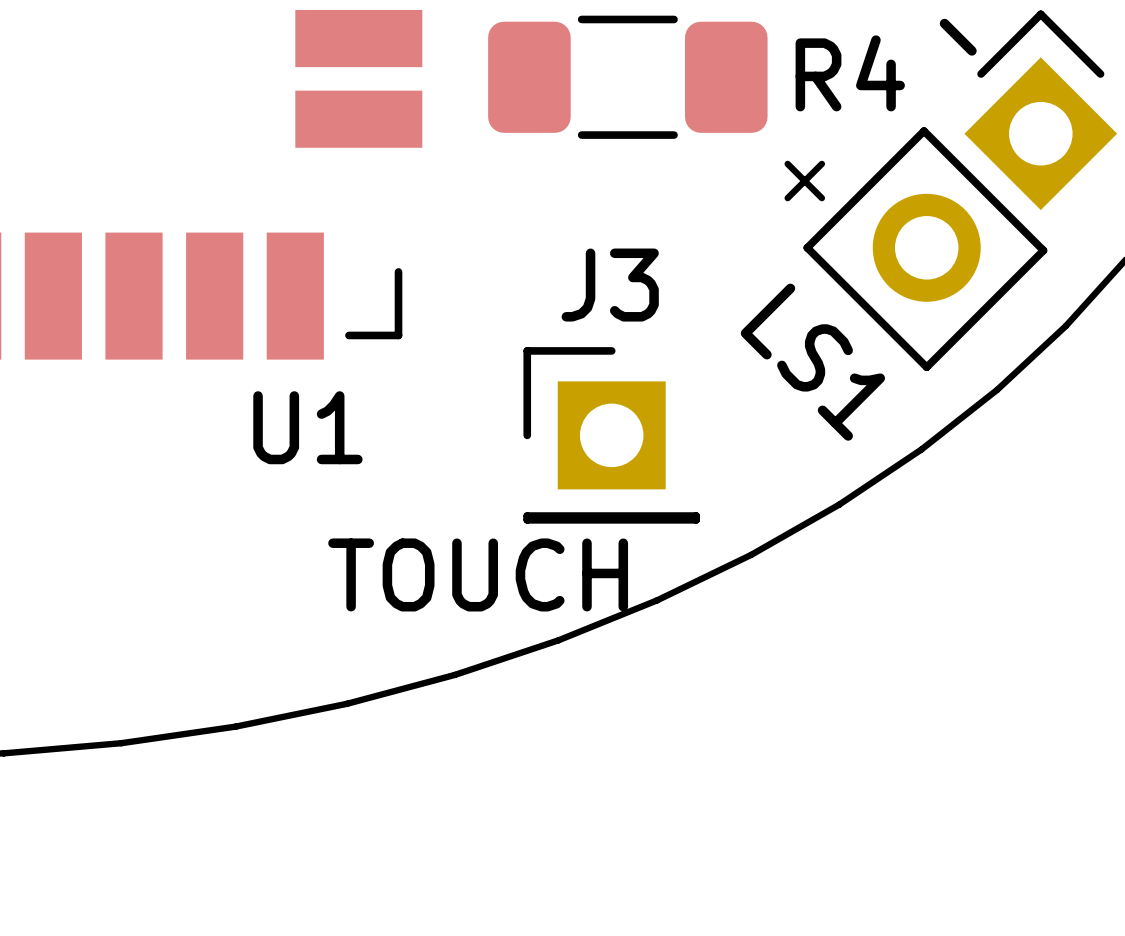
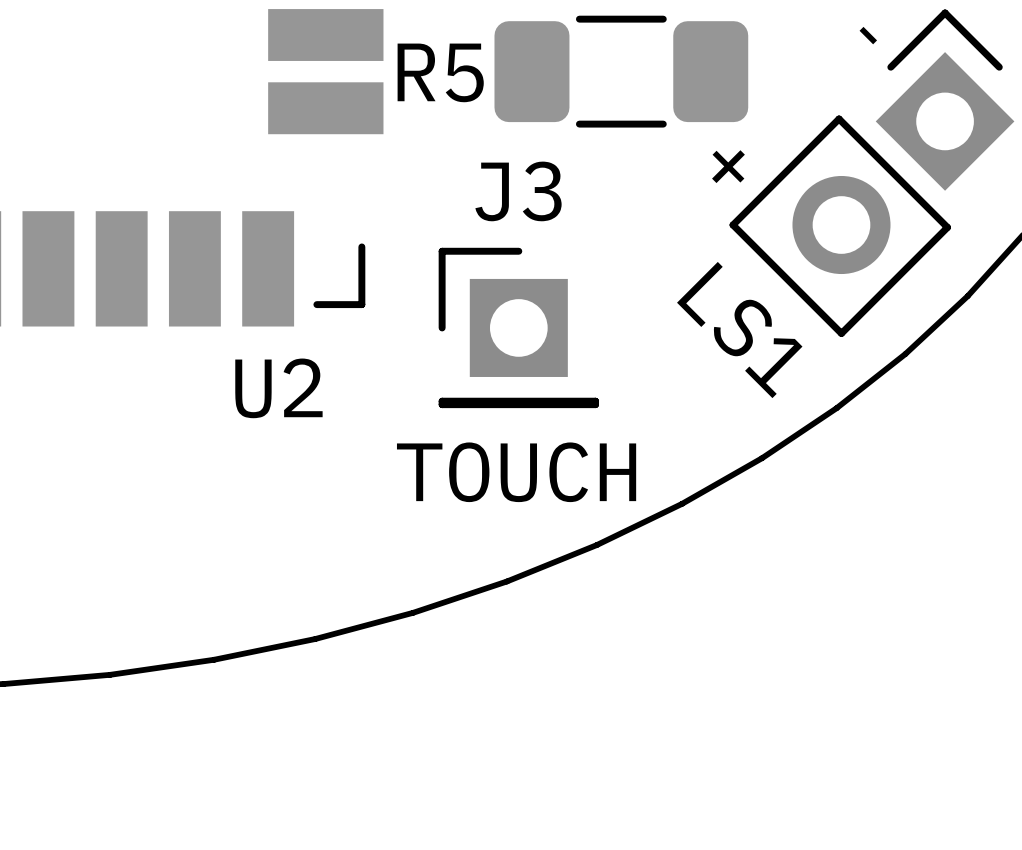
R4 name: R4 (850, 73) -> R5 (440, 72)
R4 position: (627, 77) -> (621, 71)
U1 name: U1 (307, 427) -> U2 (278, 388)
J3 position: (611, 435) -> (518, 327)
J3 value position: TOUCH (478, 574) -> TOUCH (516, 472)

